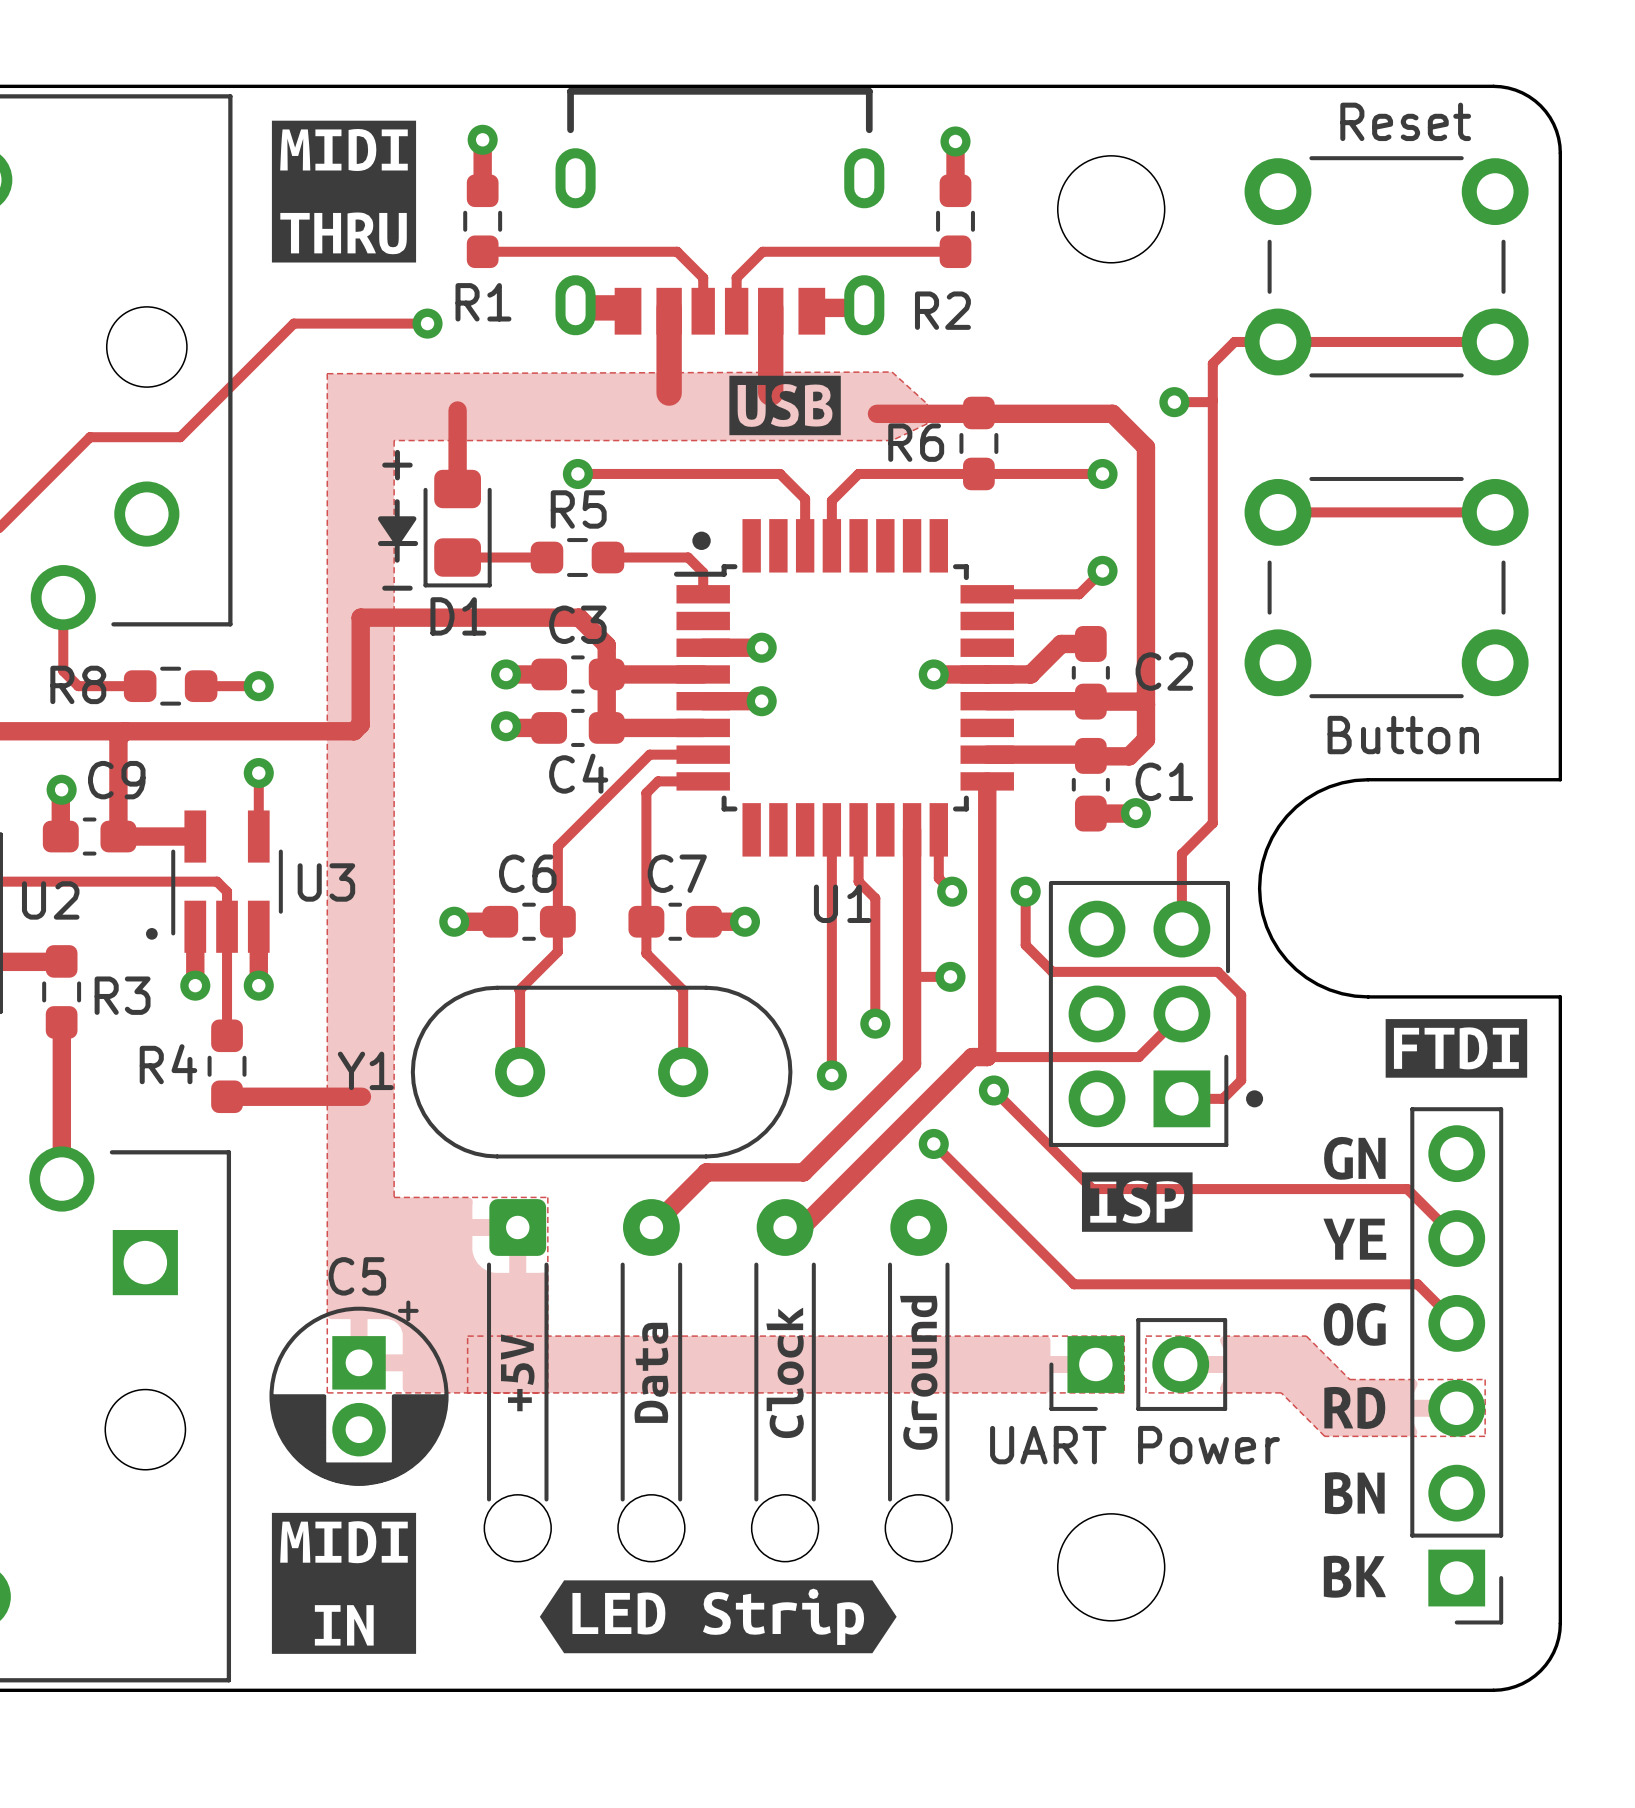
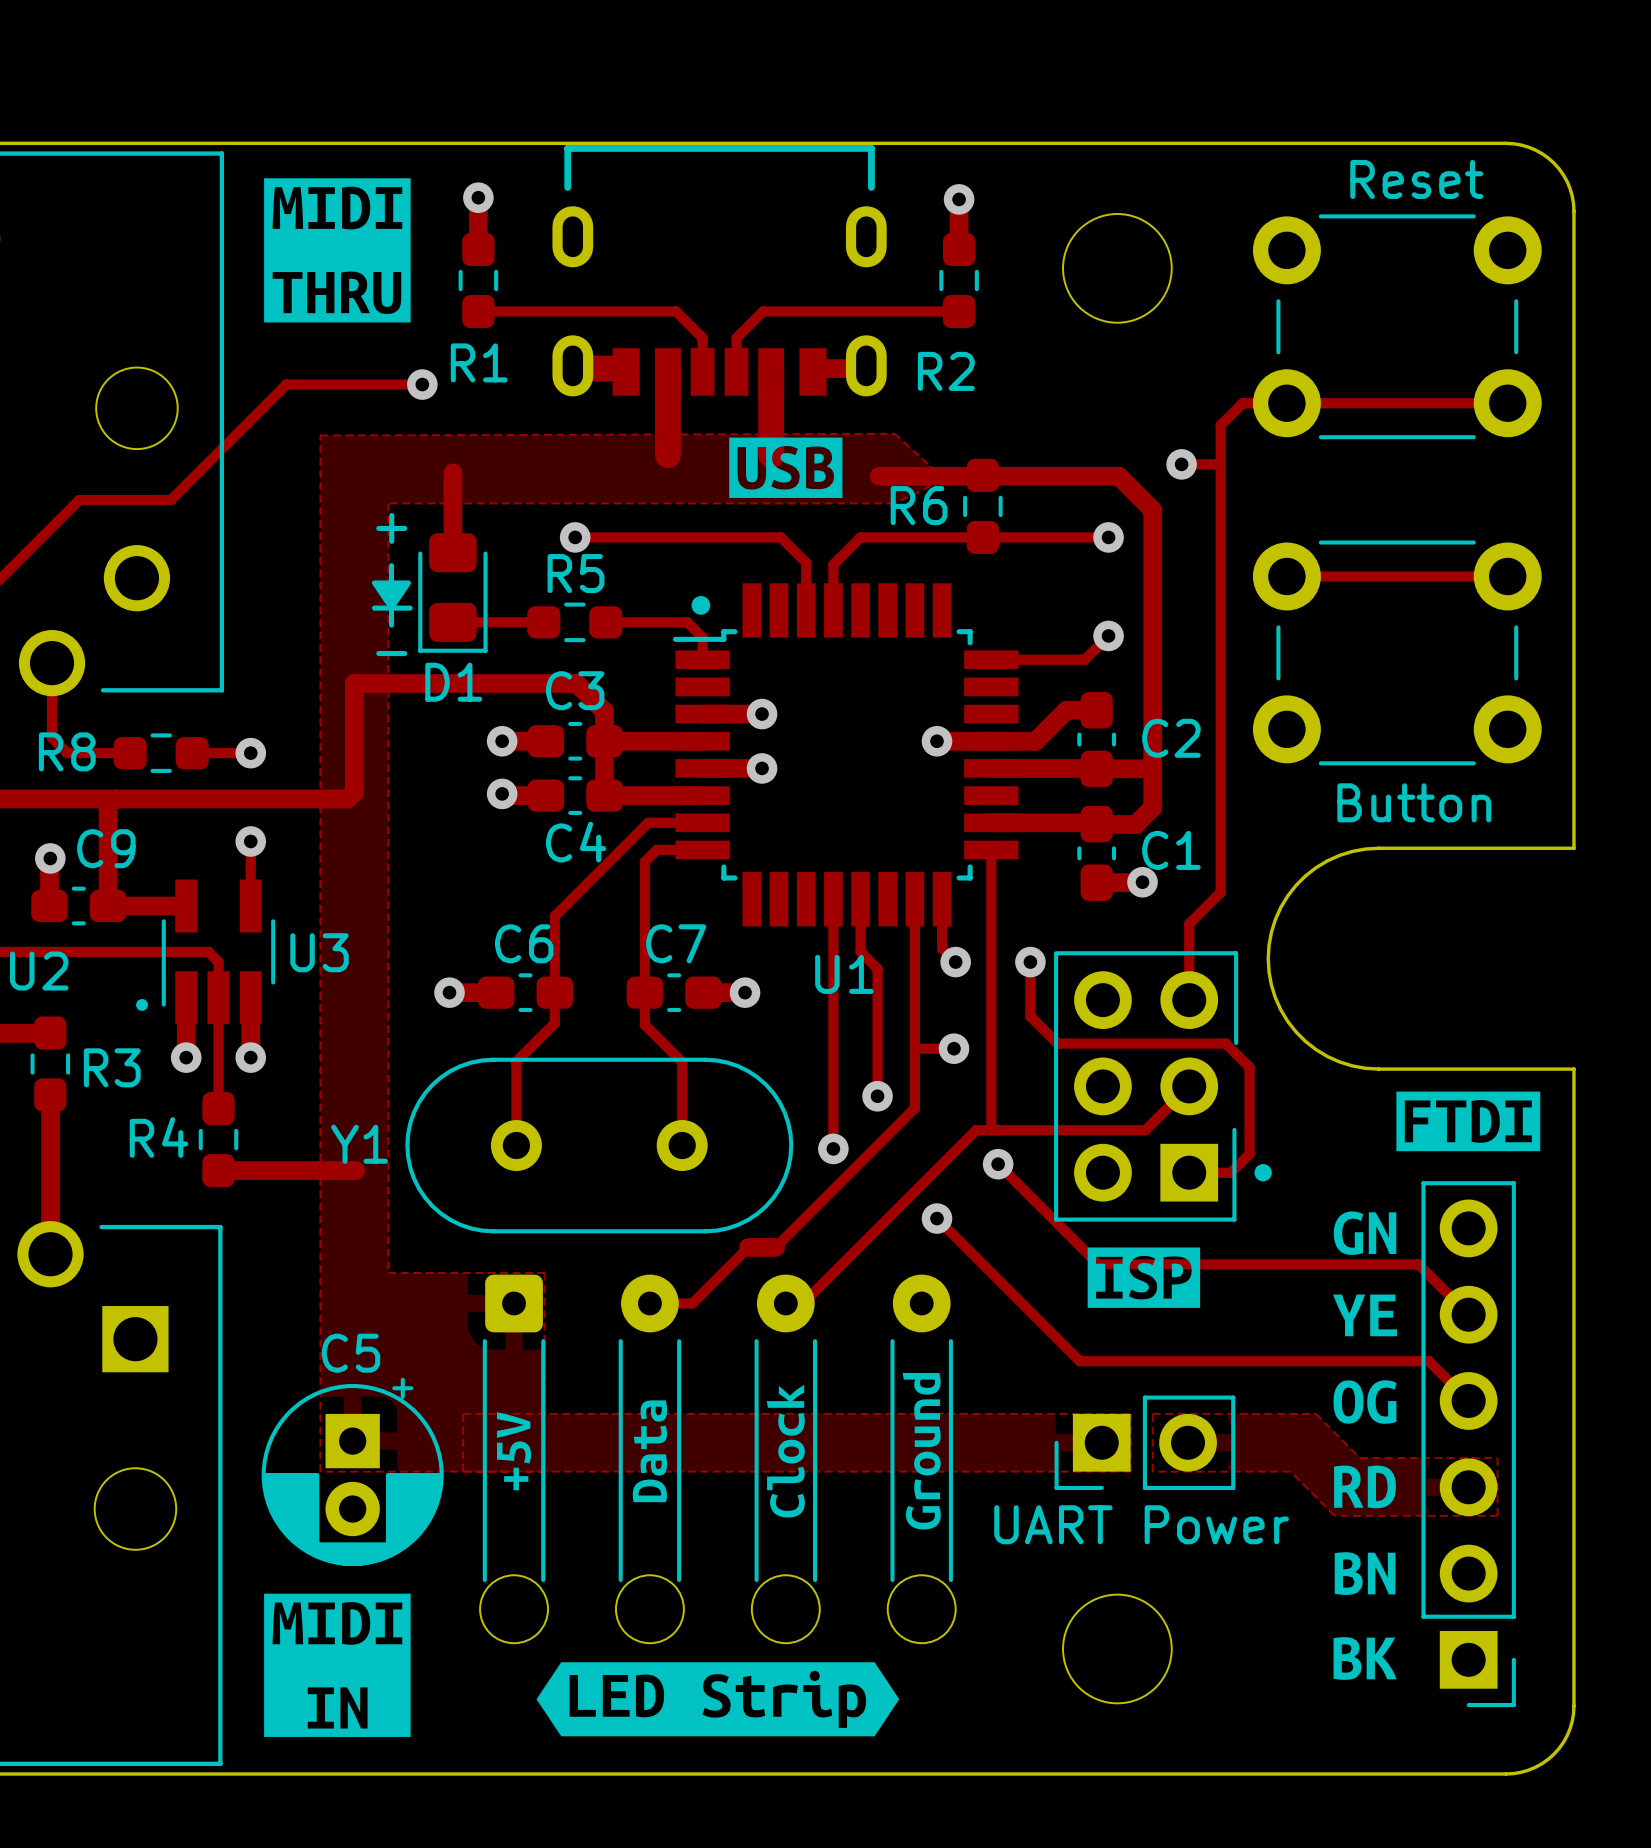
track width: thick (987, 781) (987, 1057) (972, 1057) (801, 1227) (785, 1227) -> thin (991, 849) (991, 1130) (976, 1130) (802, 1303) (785, 1303)
track width: thick (912, 829) (912, 1035) -> thin (914, 899) (914, 1108)
track: (912, 1035) (912, 1063) (803, 1172) (775, 1172) -> (914, 1108) (775, 1247)
track: (748, 1172) (706, 1172) (651, 1227) -> (748, 1247) (692, 1303) (649, 1303)

